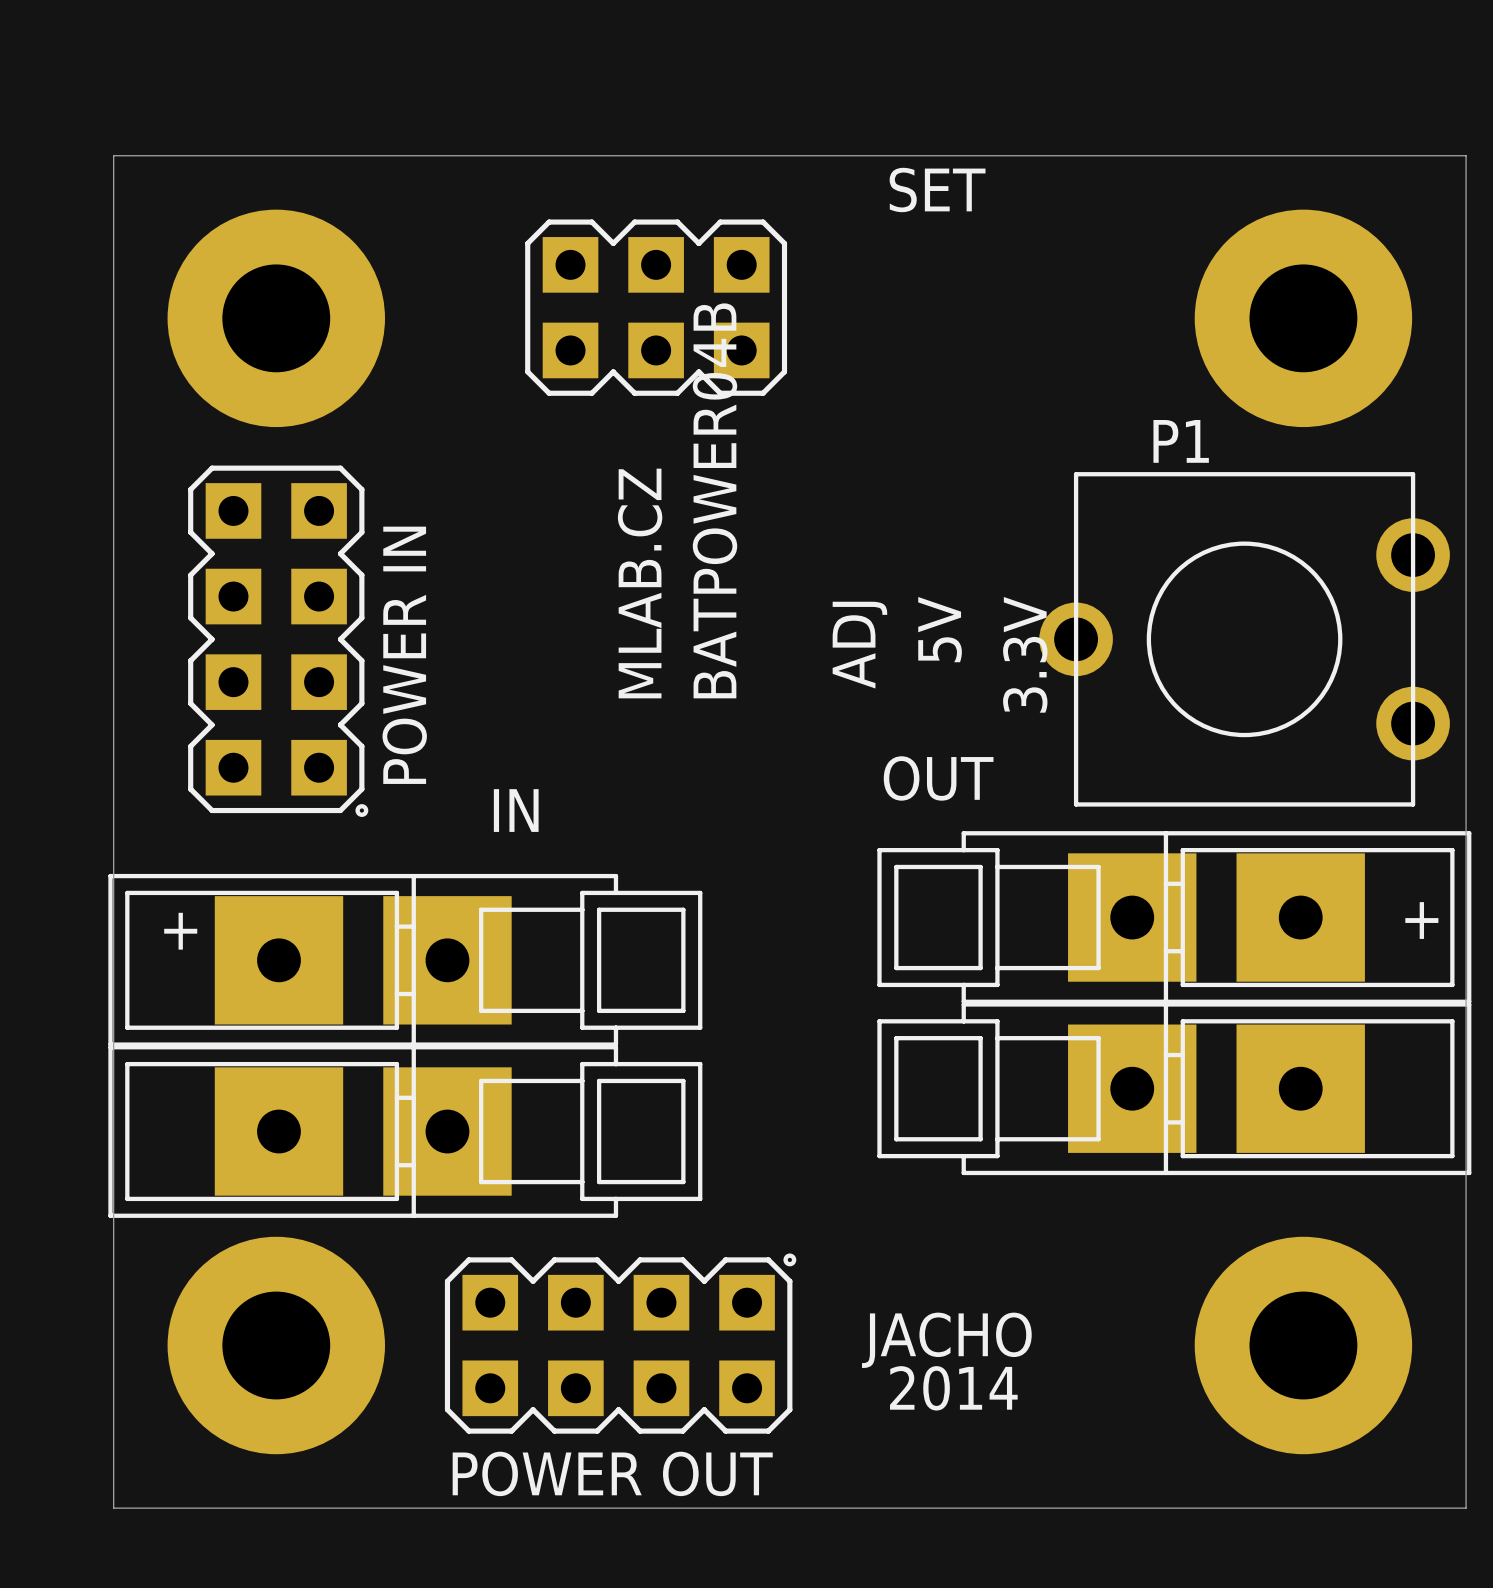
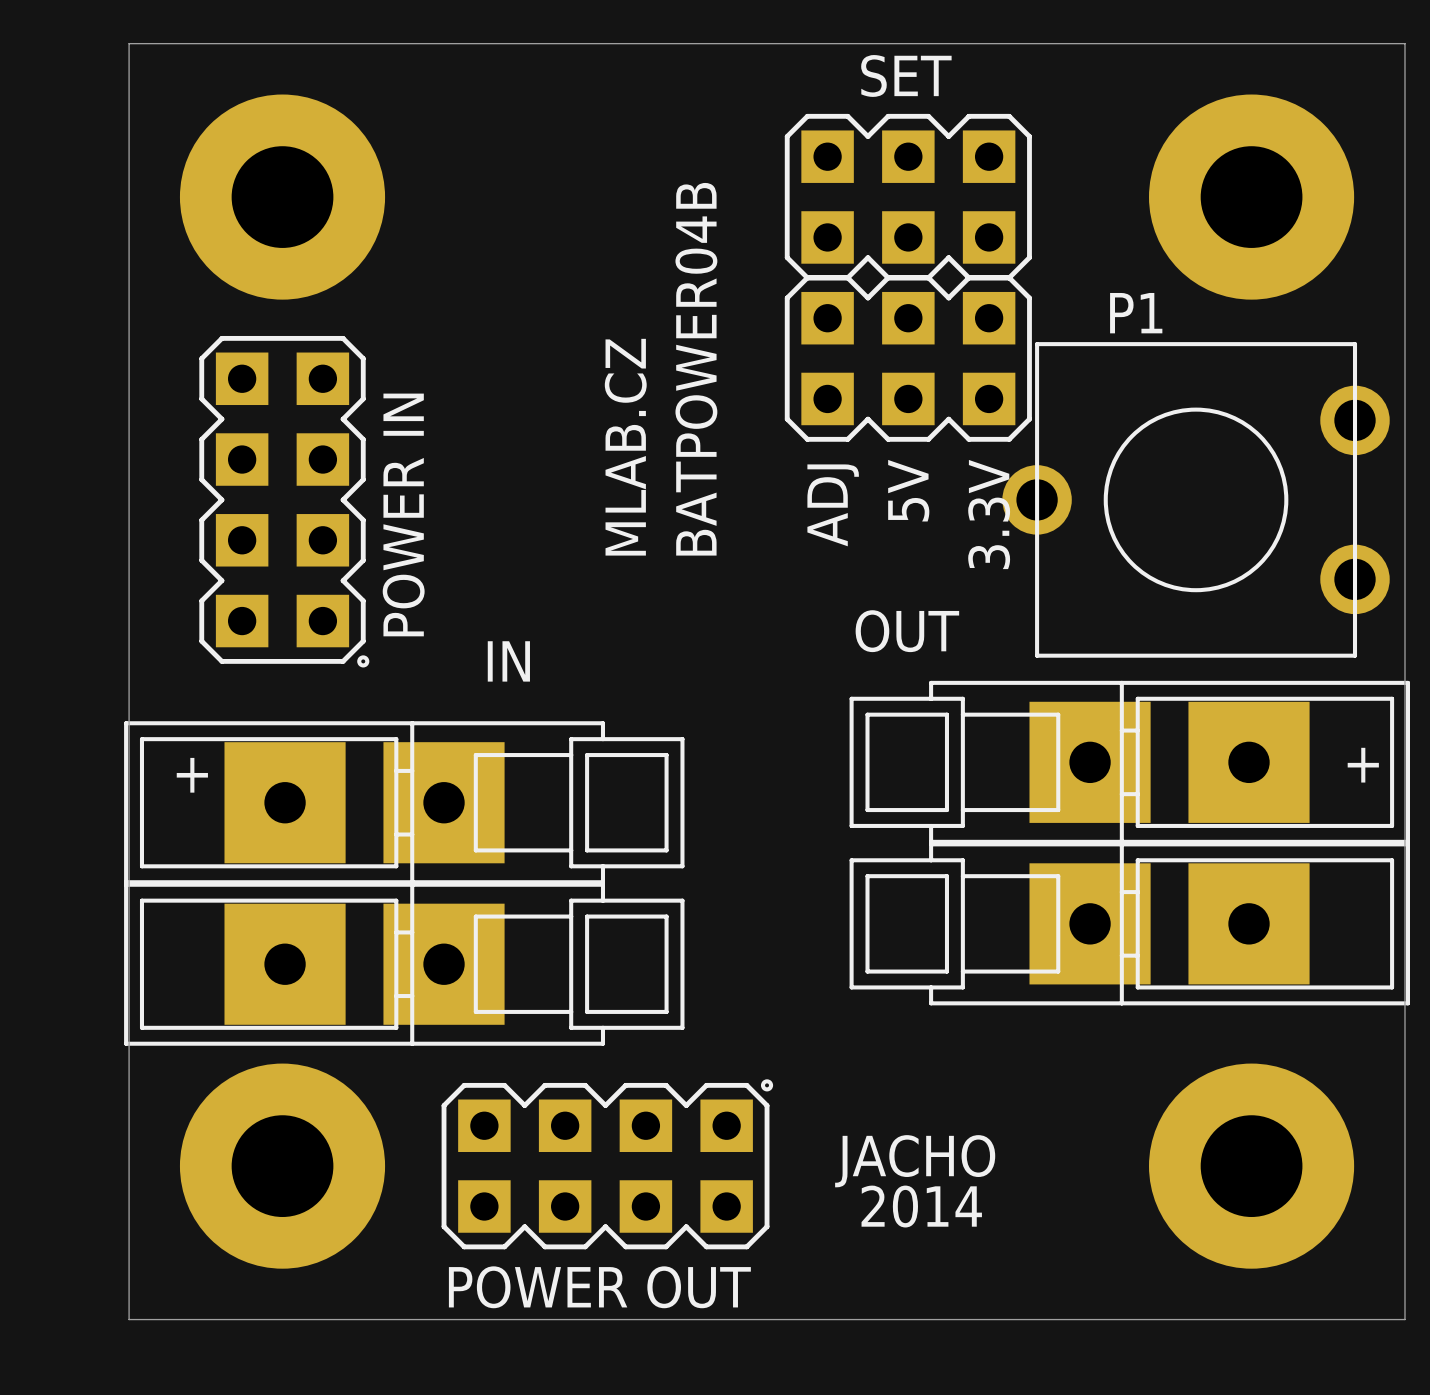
part: (656, 307) -> none
part: none -> (908, 197)
part: none -> (908, 358)

